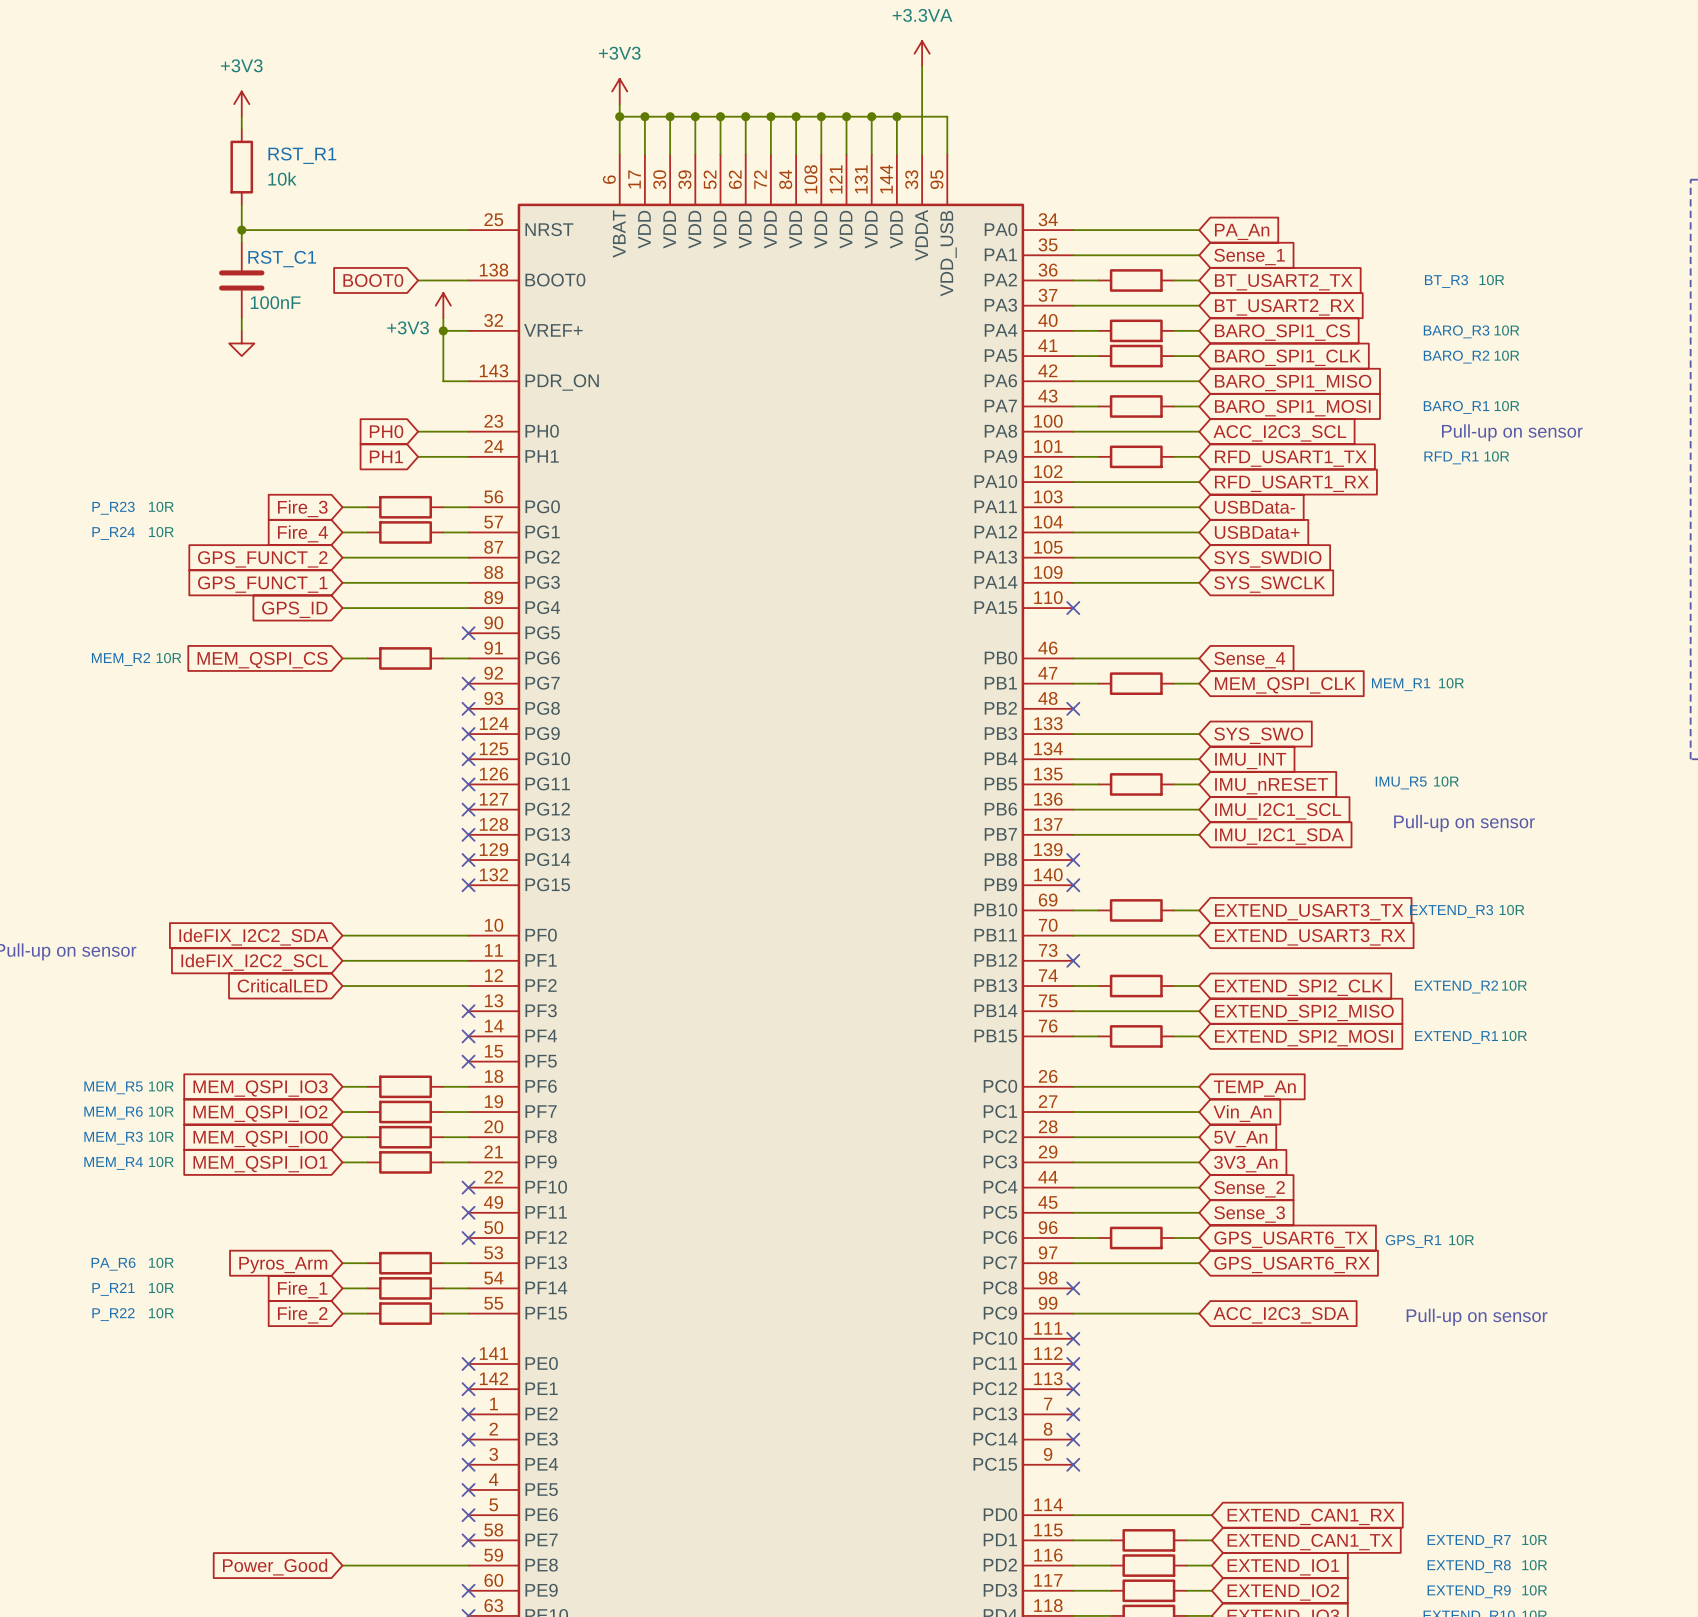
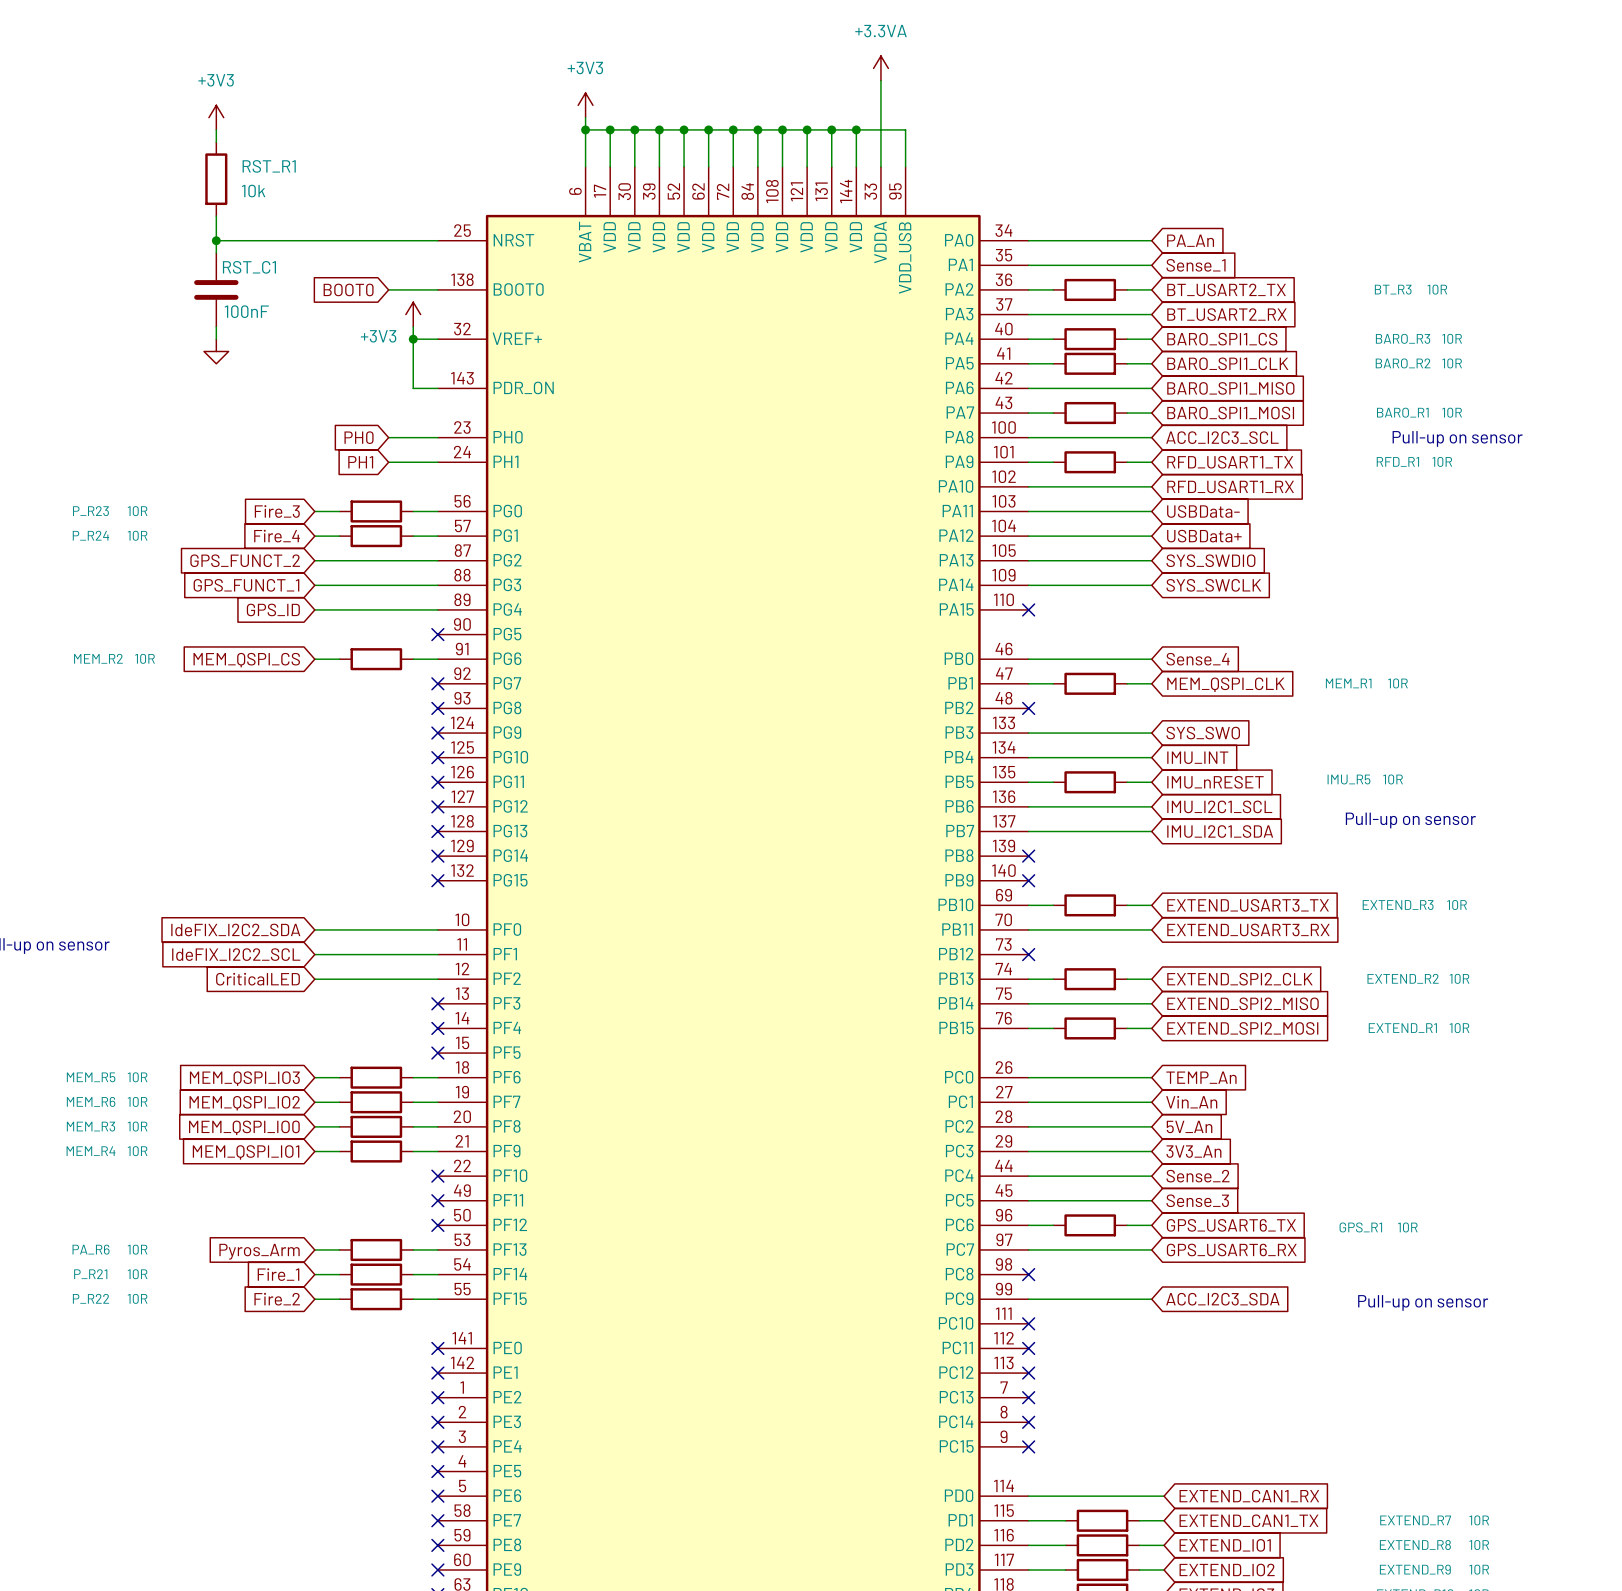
wire: (342, 1565) (468, 1565) -> none
no-connect mark: none -> (437, 1545)
global label: Power_Good (275, 1567) -> none

